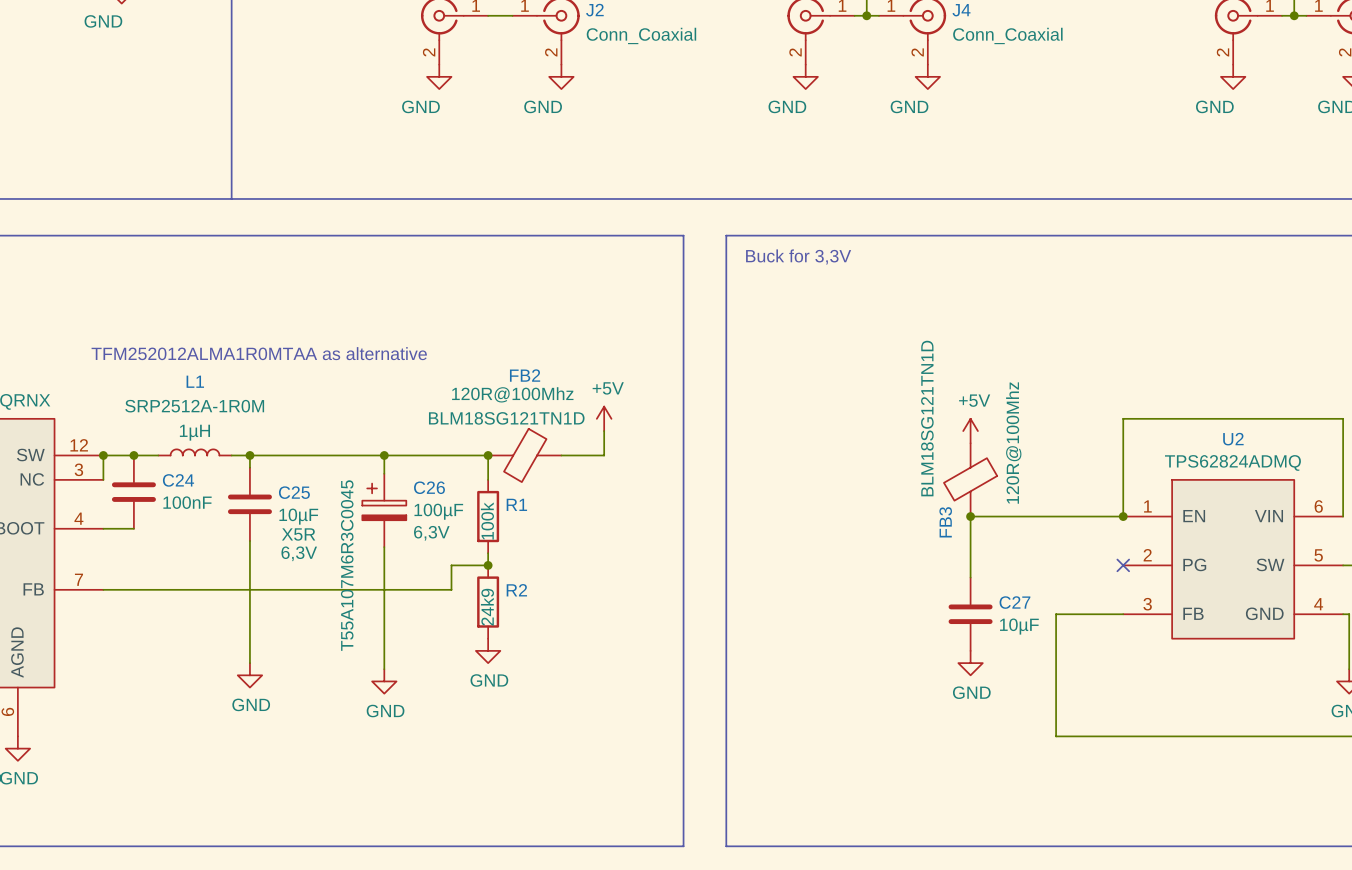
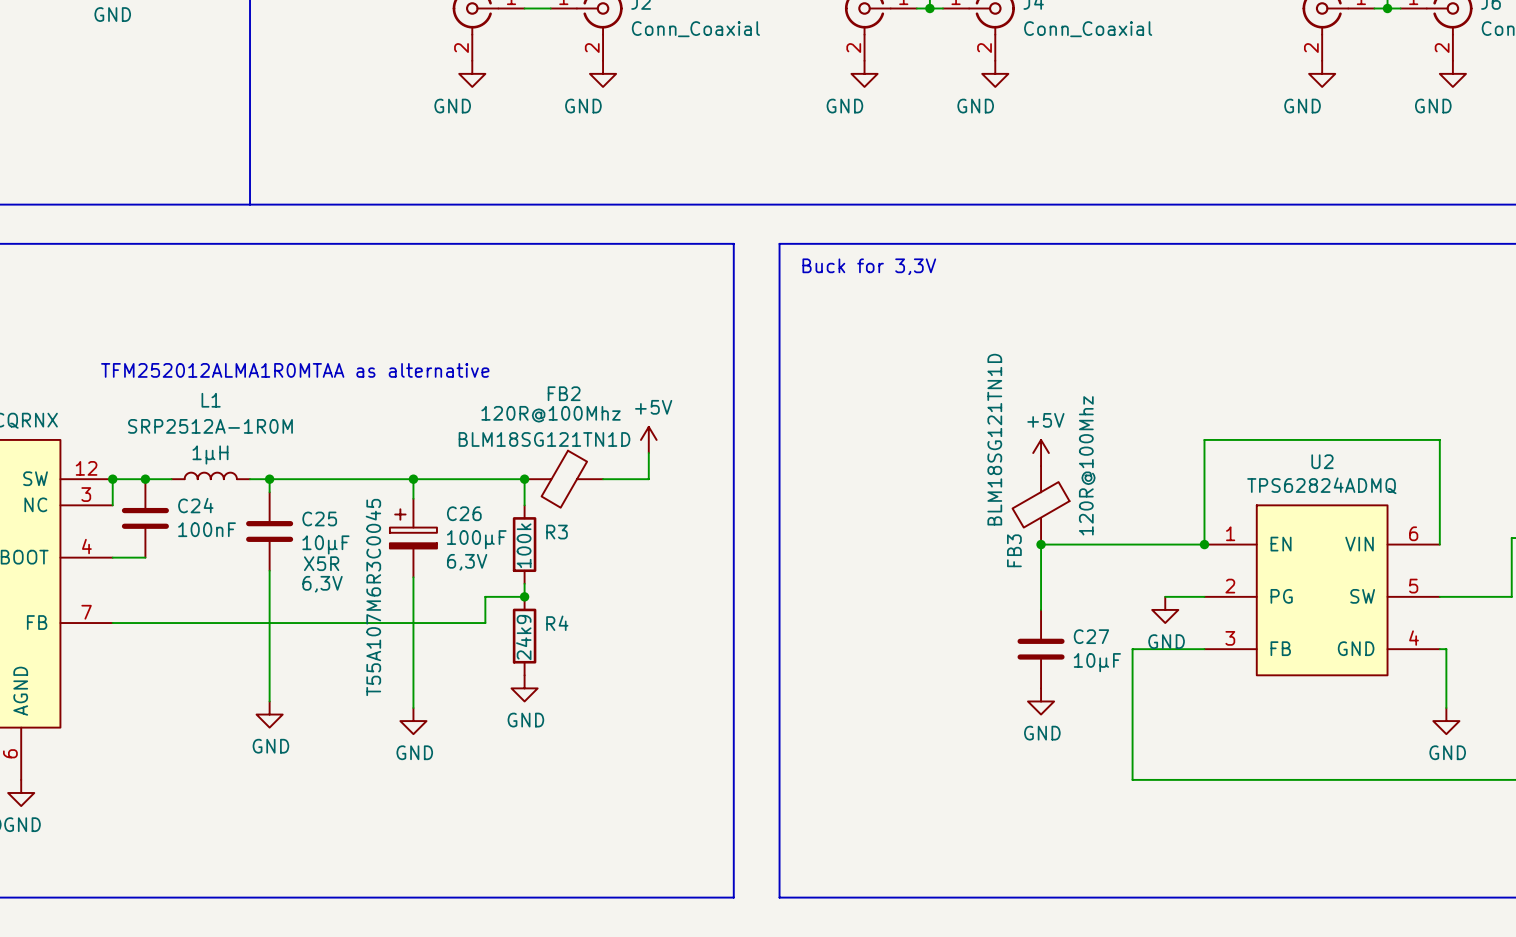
R1 name: R1 (516, 504) -> R3 (557, 532)
wire: none -> (1165, 596) (1204, 596)
no-connect mark: (1123, 565) -> none
power symbol: none -> GND (1165, 609)
R2 name: R2 (516, 590) -> R4 (557, 623)

